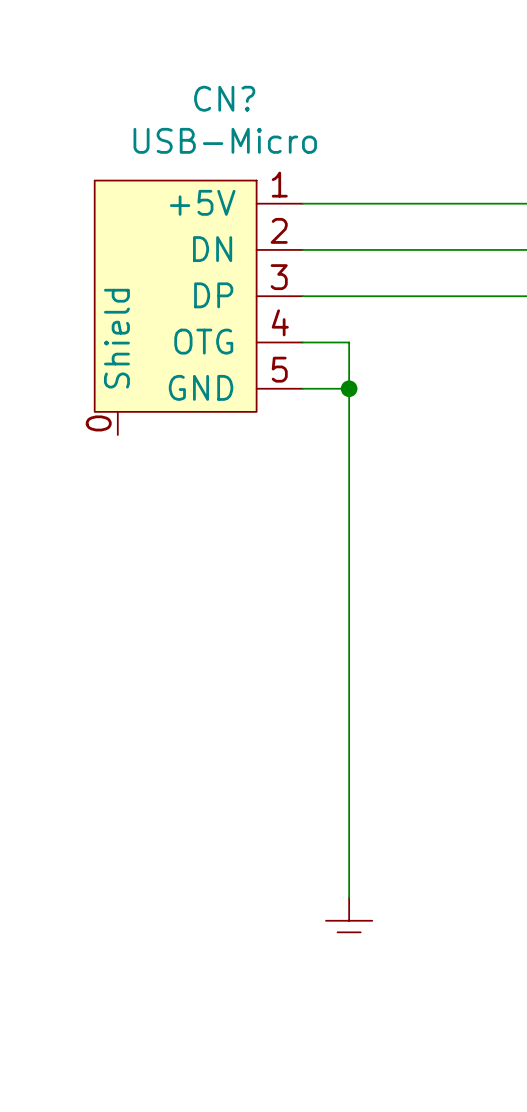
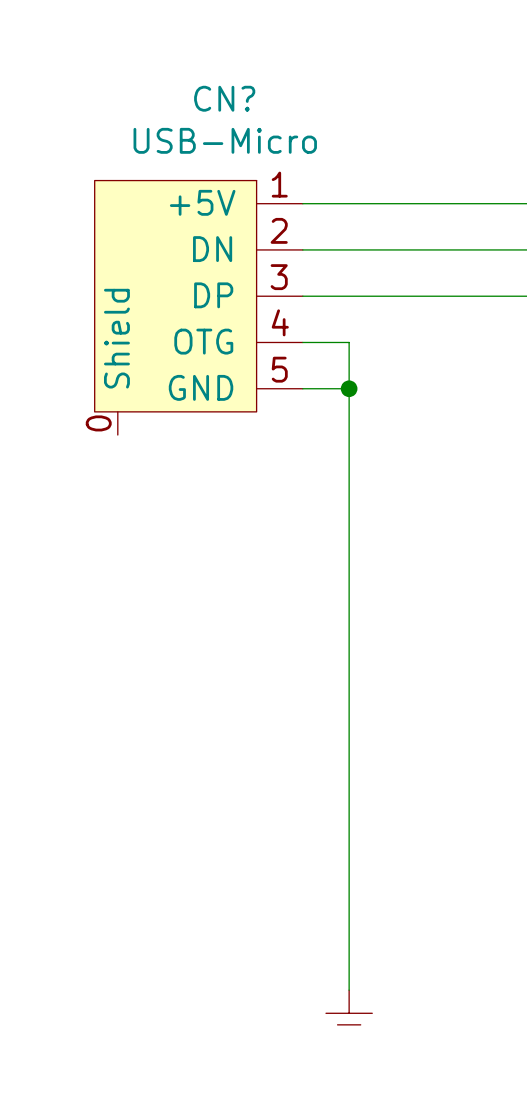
wire: none -> (349, 897) (349, 990)
power symbol position: (349, 920) -> (349, 1013)

